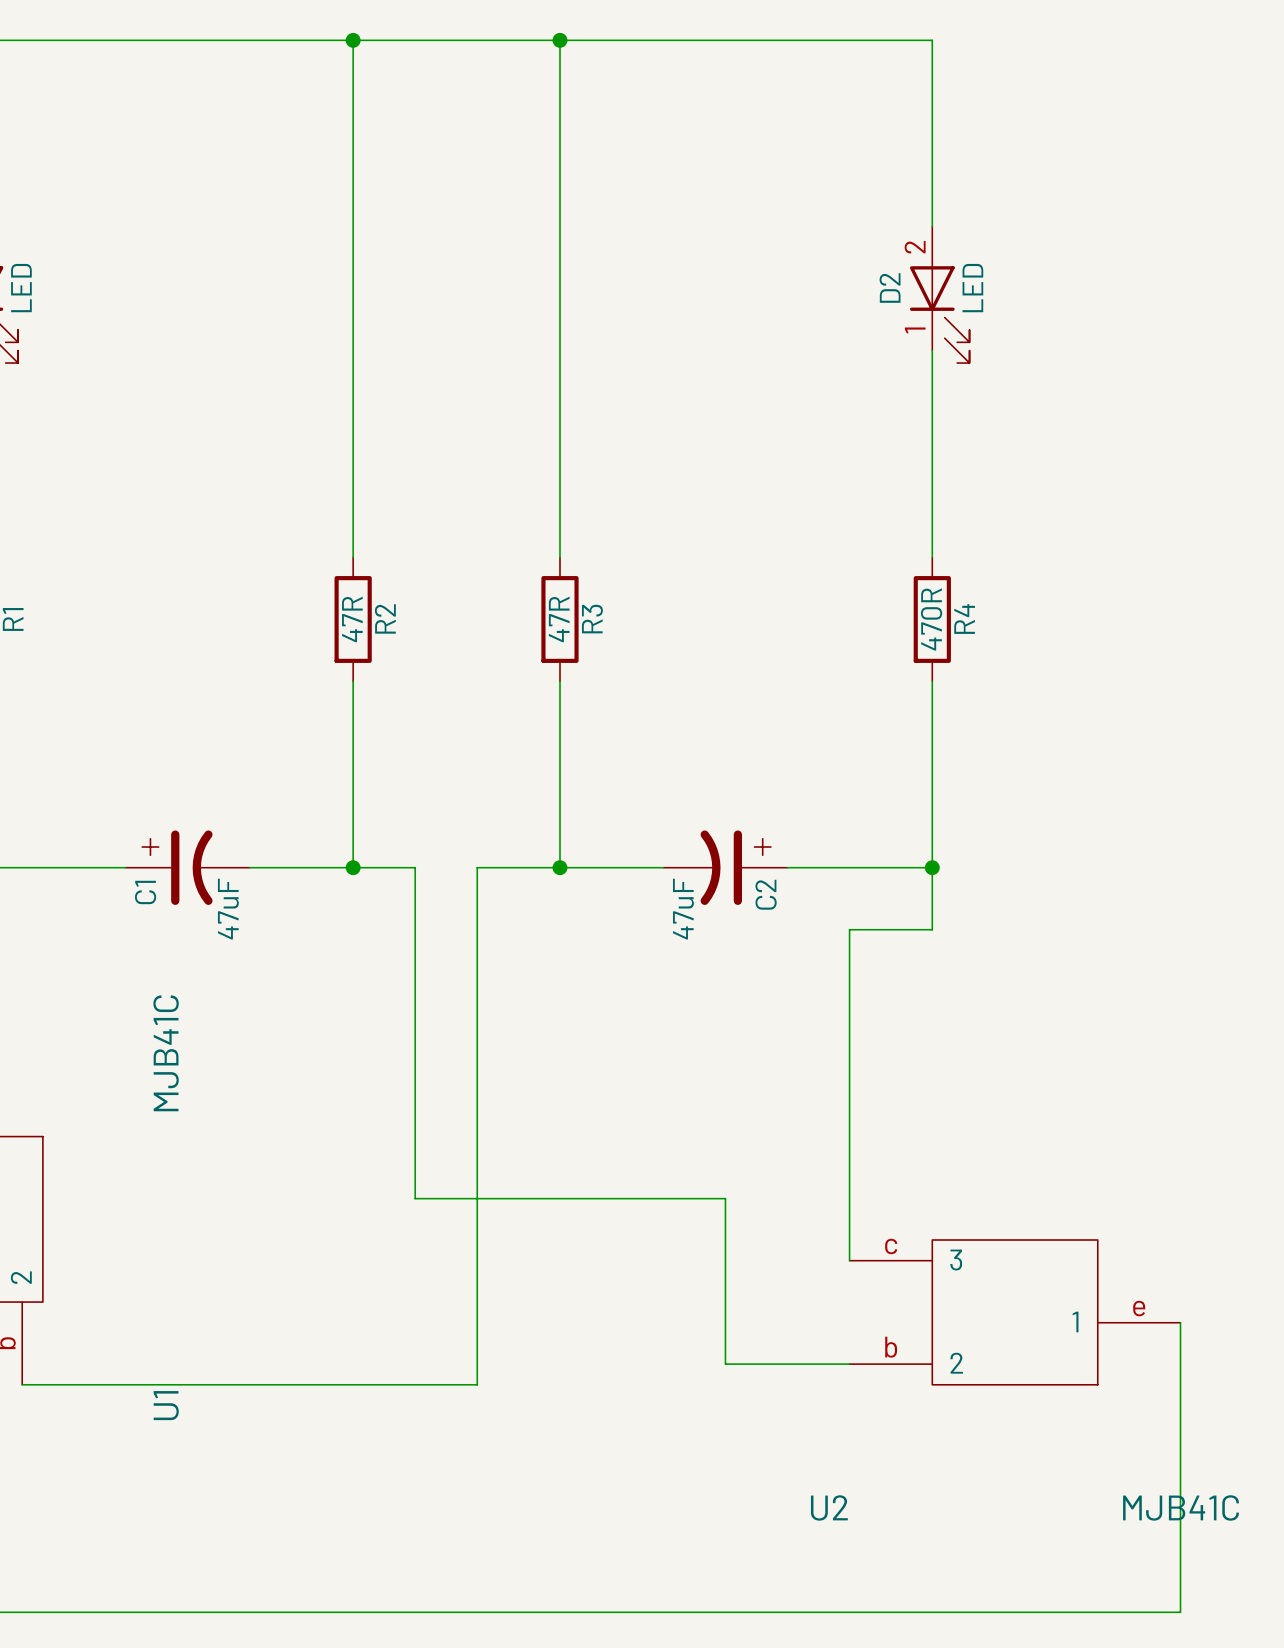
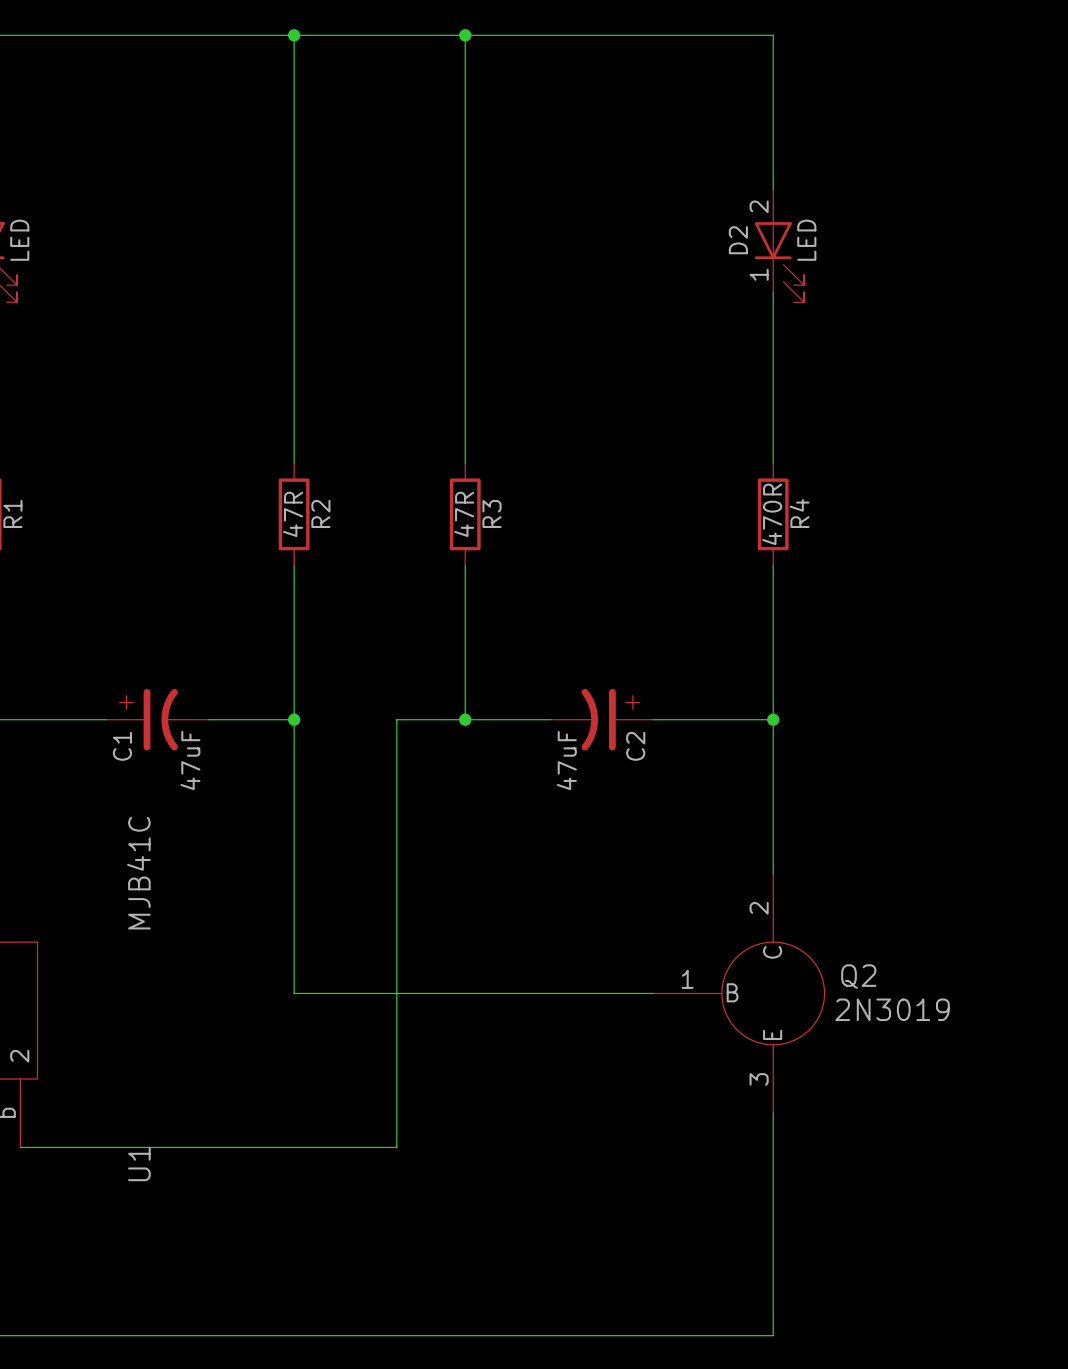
wire: (353, 867) (415, 867) (415, 1198) -> (294, 719) (294, 993) (345, 993)
wire: (932, 929) (849, 929) (849, 1260) -> (773, 771) (773, 873)
wire: (725, 1198) (725, 1364) (849, 1364) -> (602, 993) (653, 993)
Q2: none -> 2N3019 (739, 993)
U2: MJB41C (1015, 1312) -> none
wire: (1180, 1322) (1180, 1612) (932, 1612) -> (773, 1113) (773, 1335)

